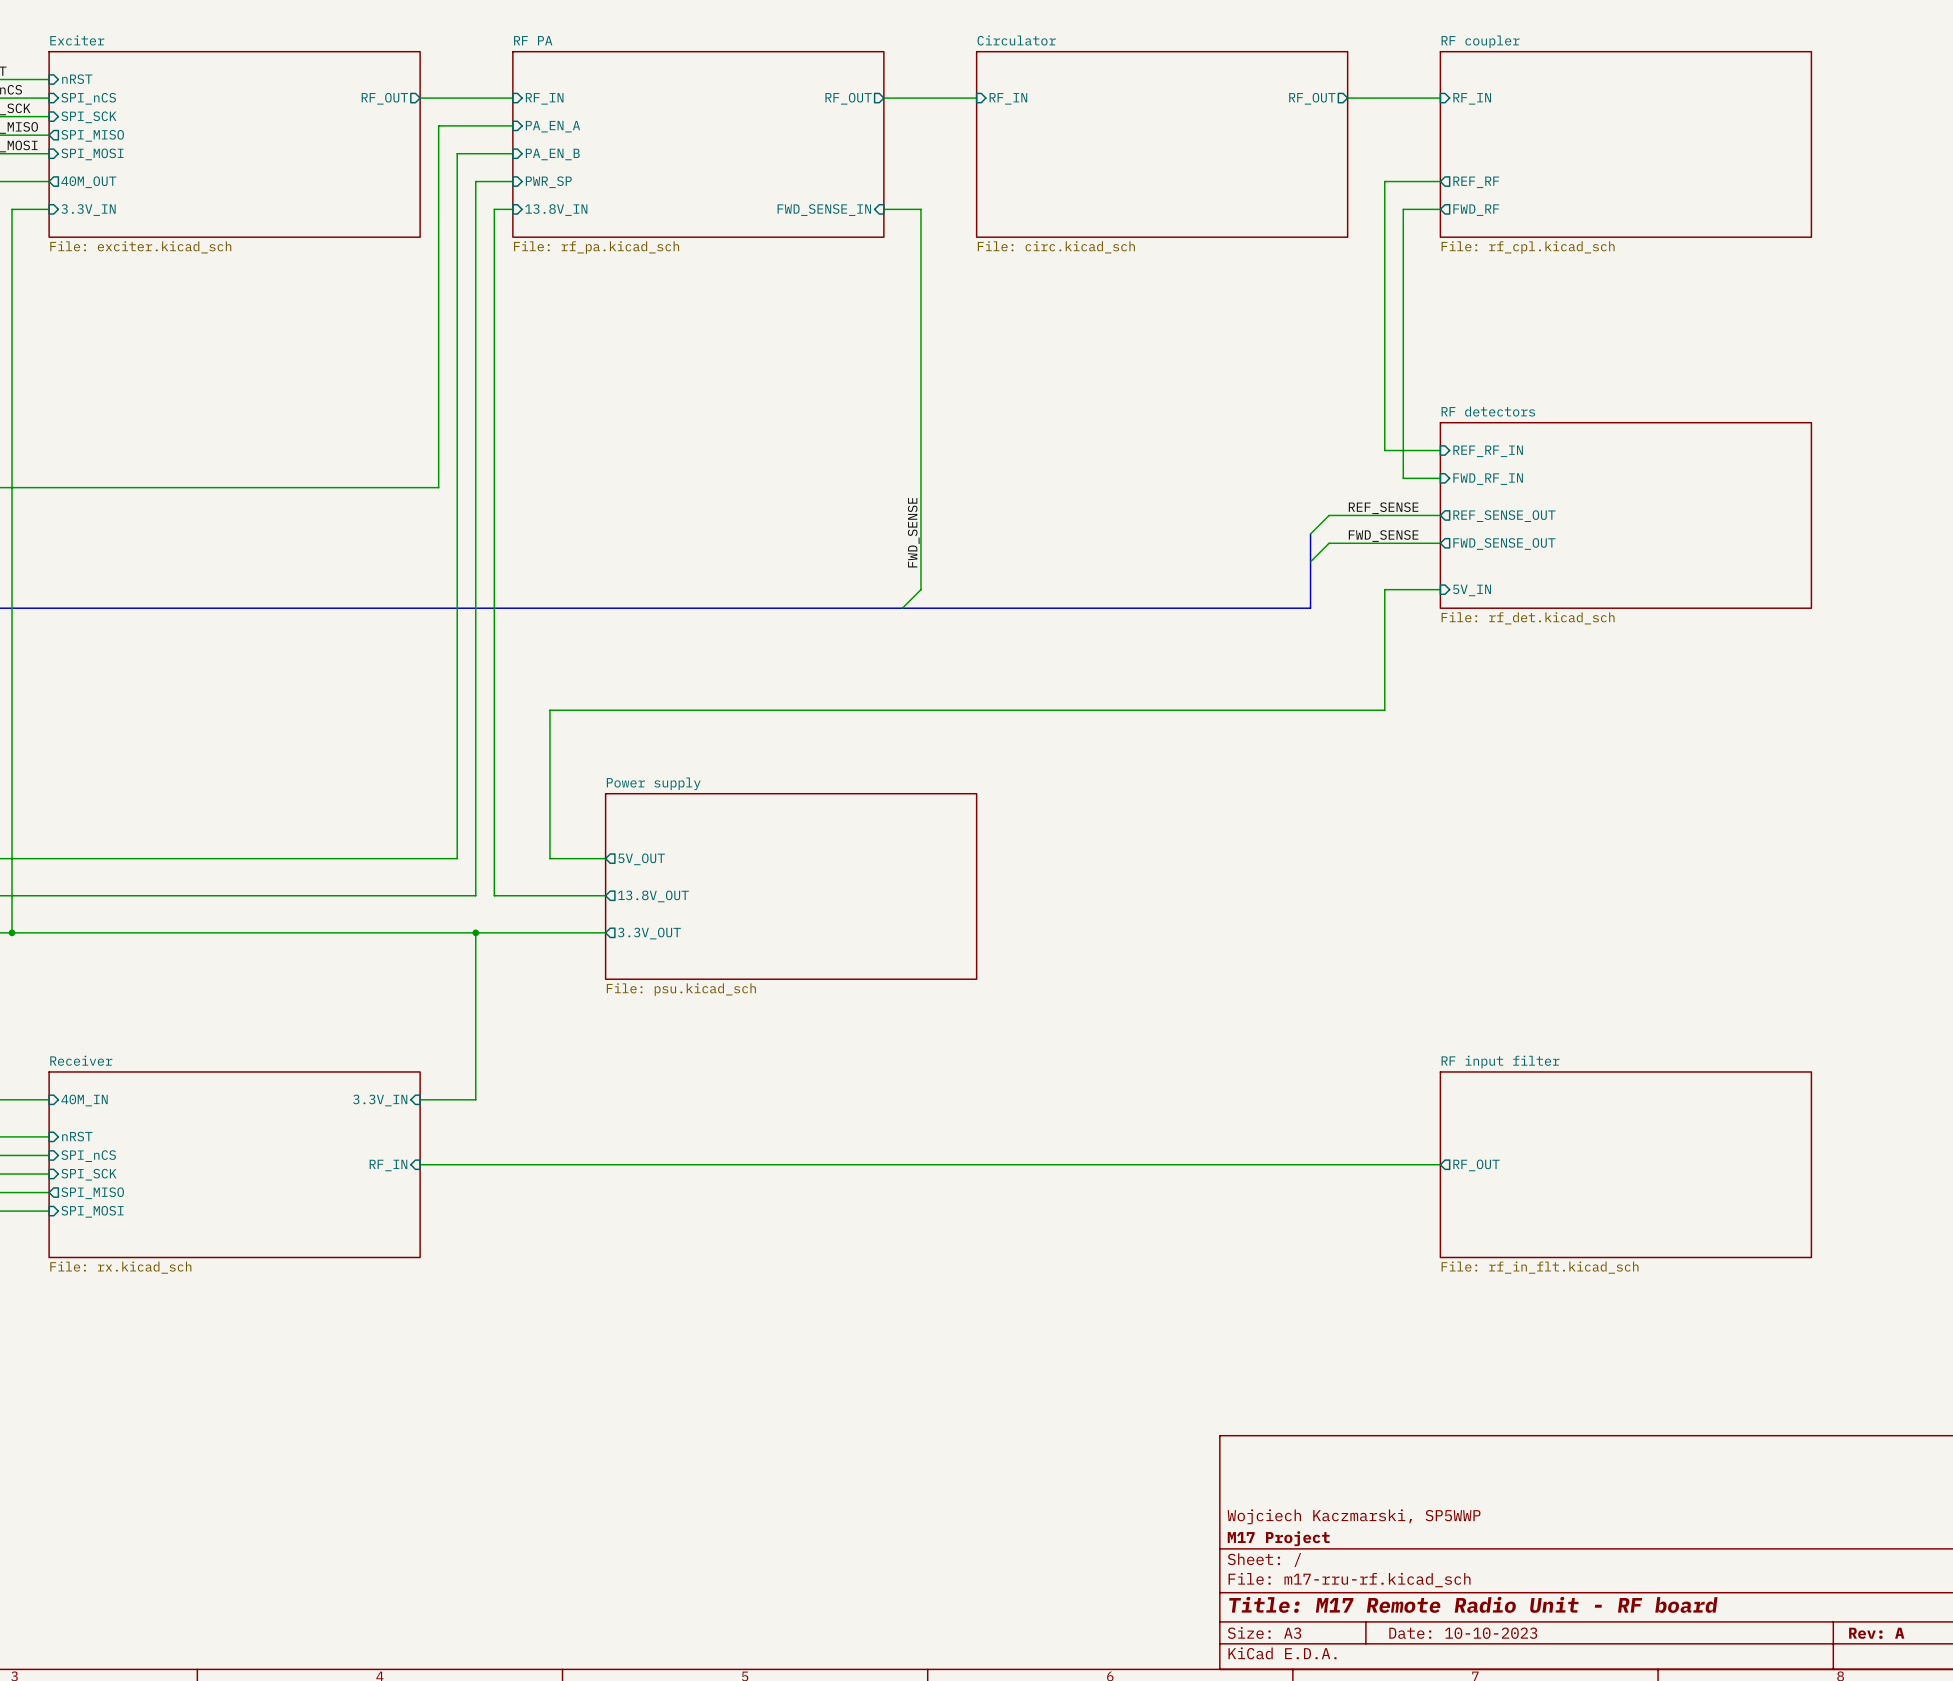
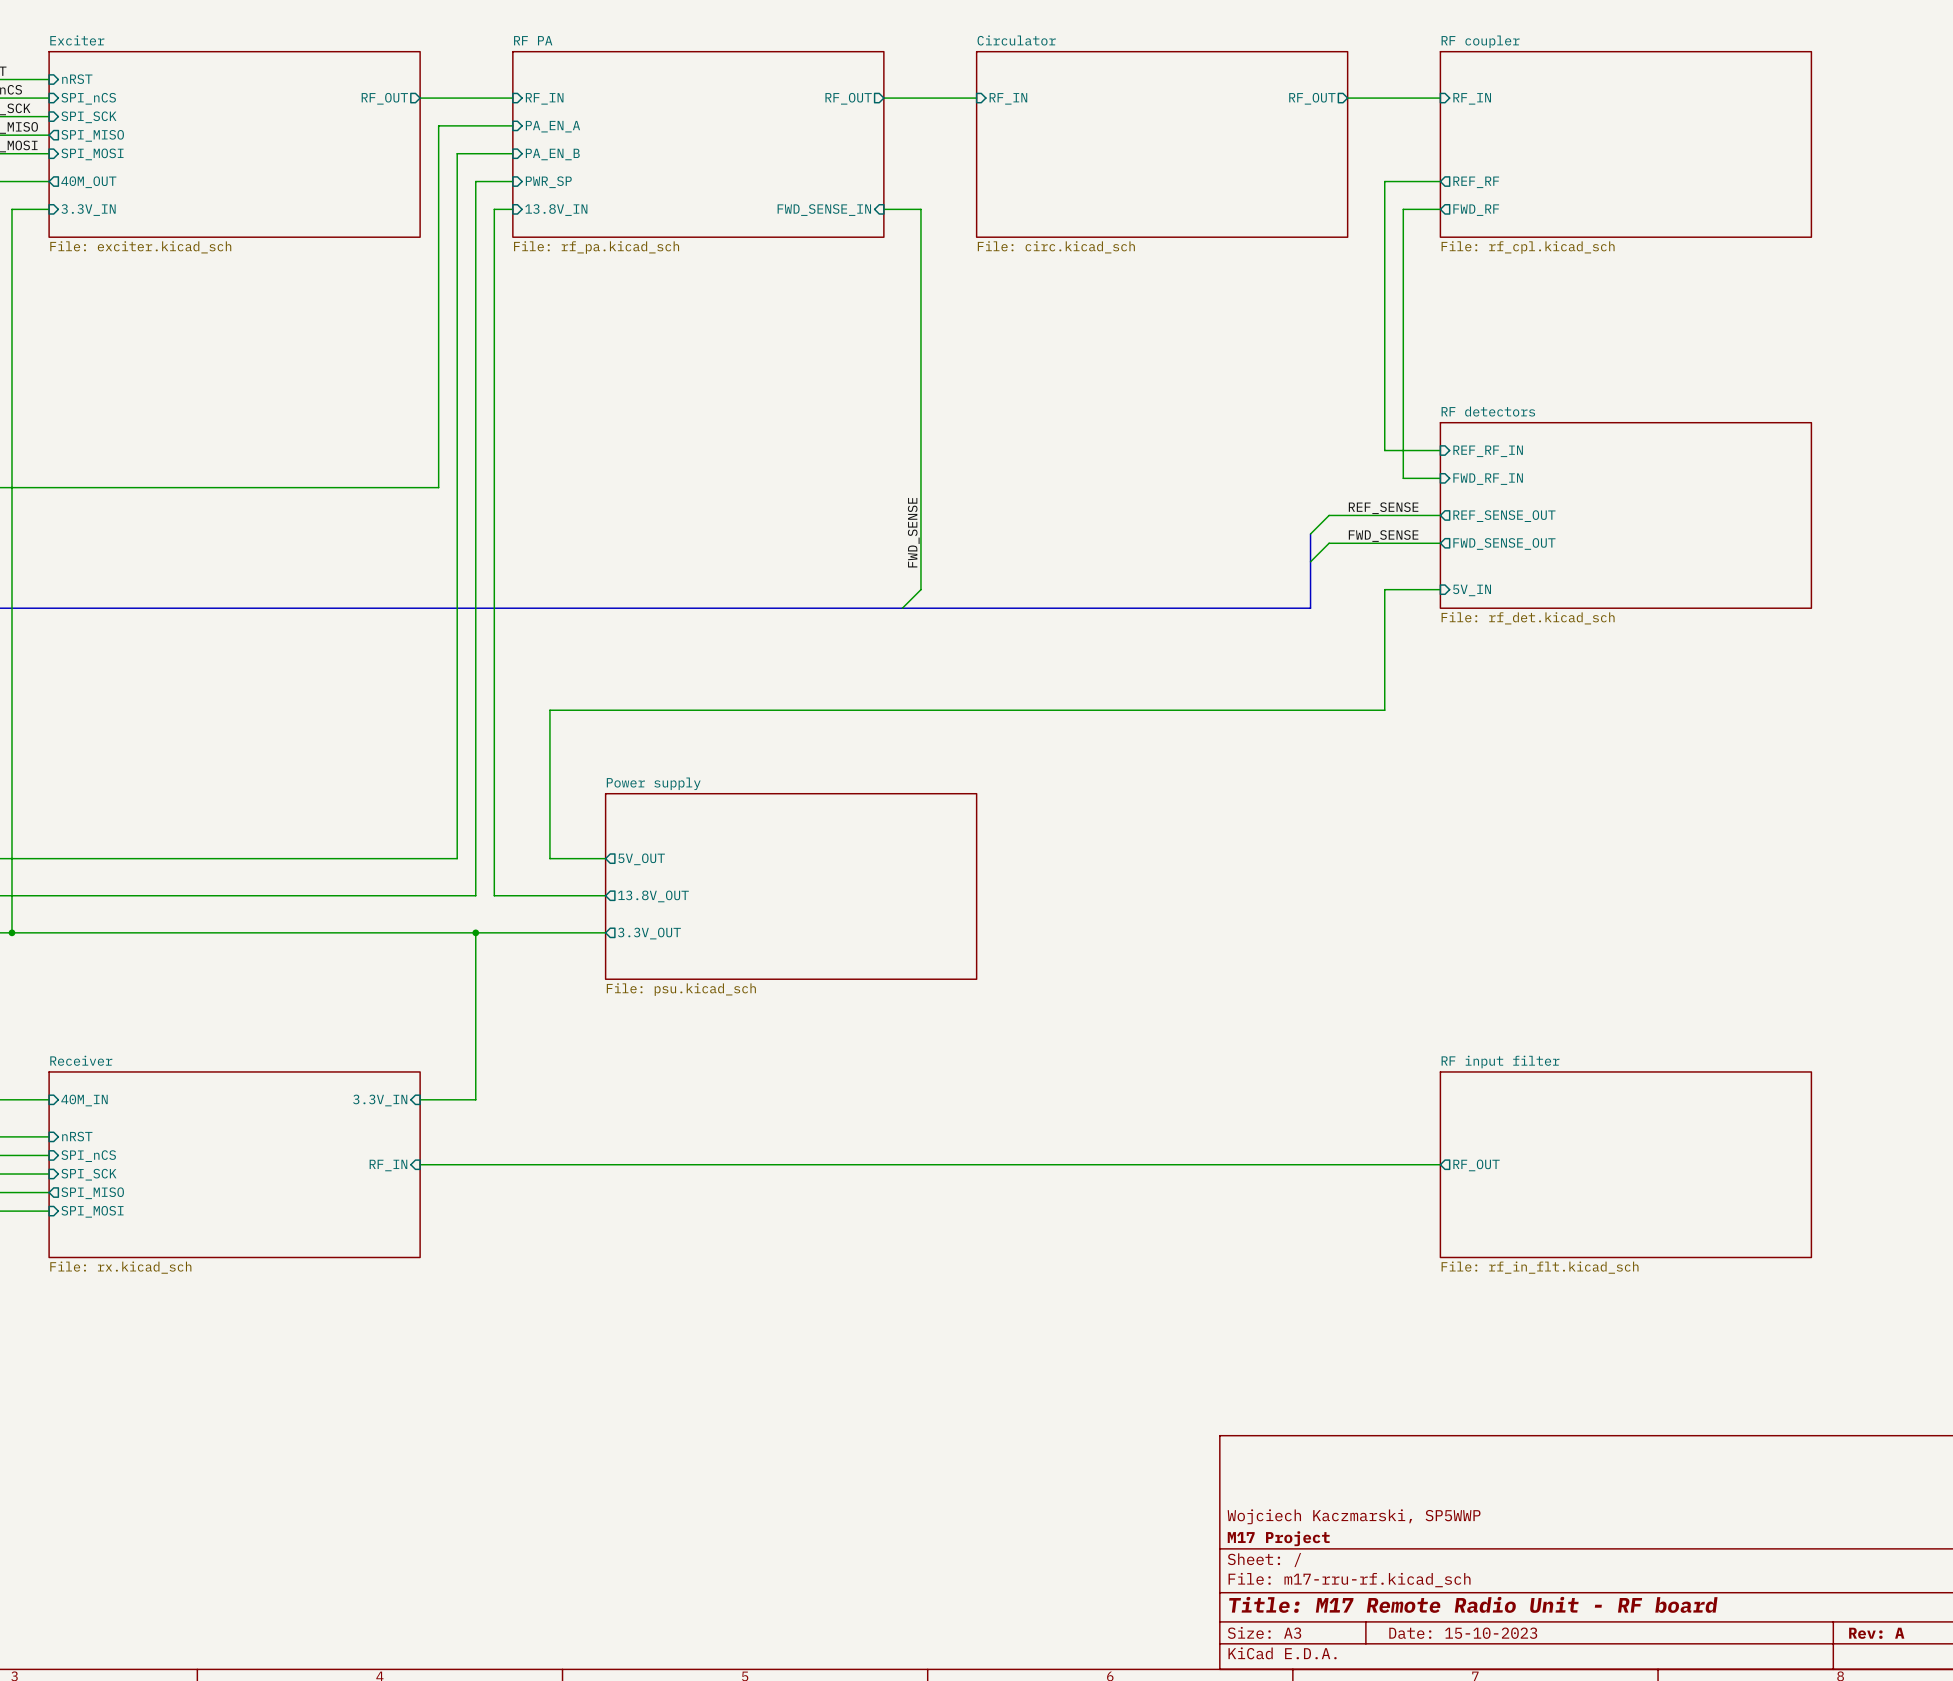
title block: Date: 10-10-2023 (1463, 1633) -> Date: 15-10-2023 (1463, 1633)

